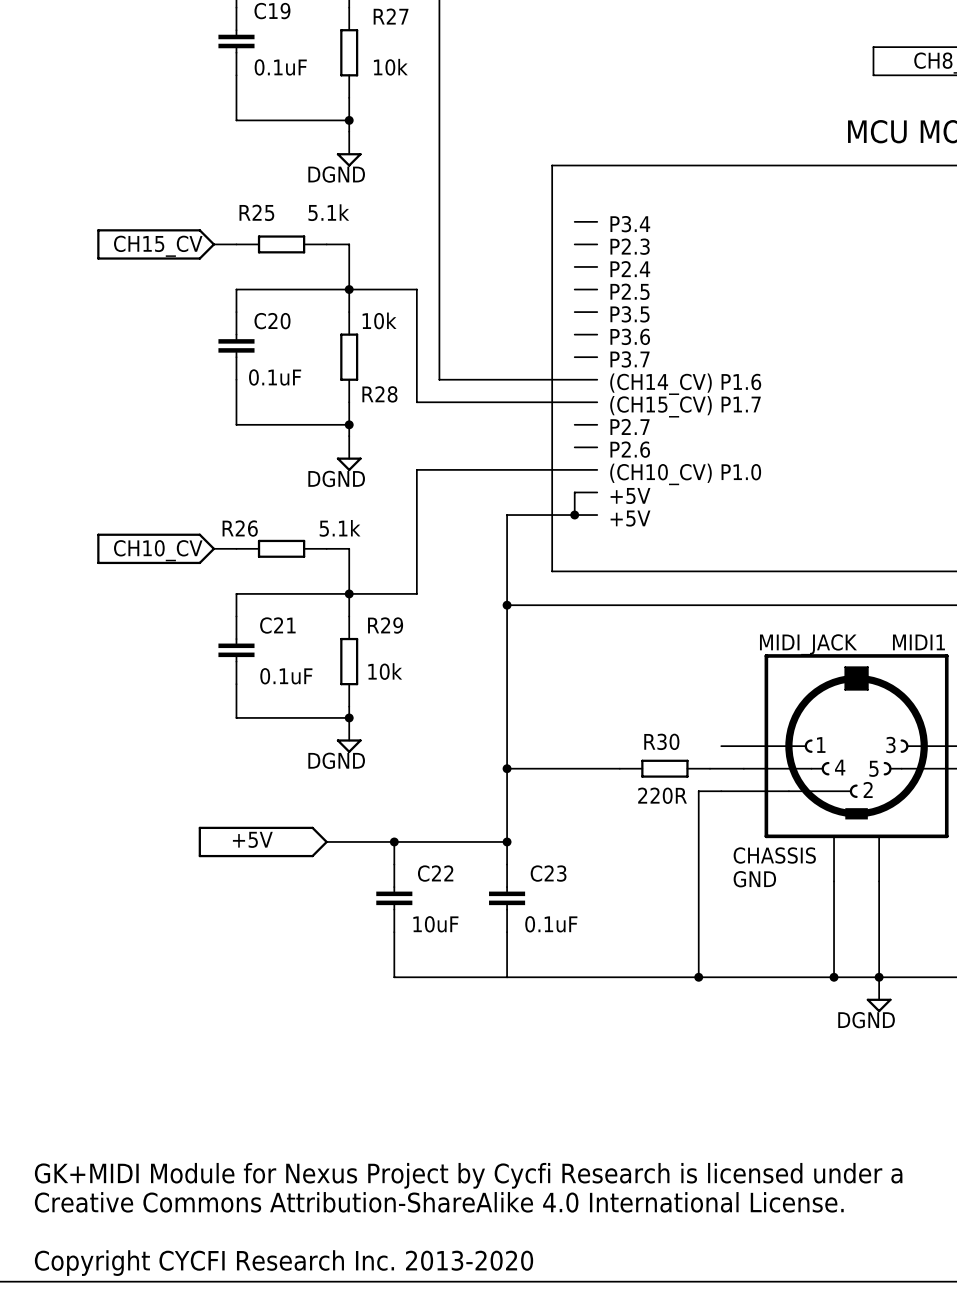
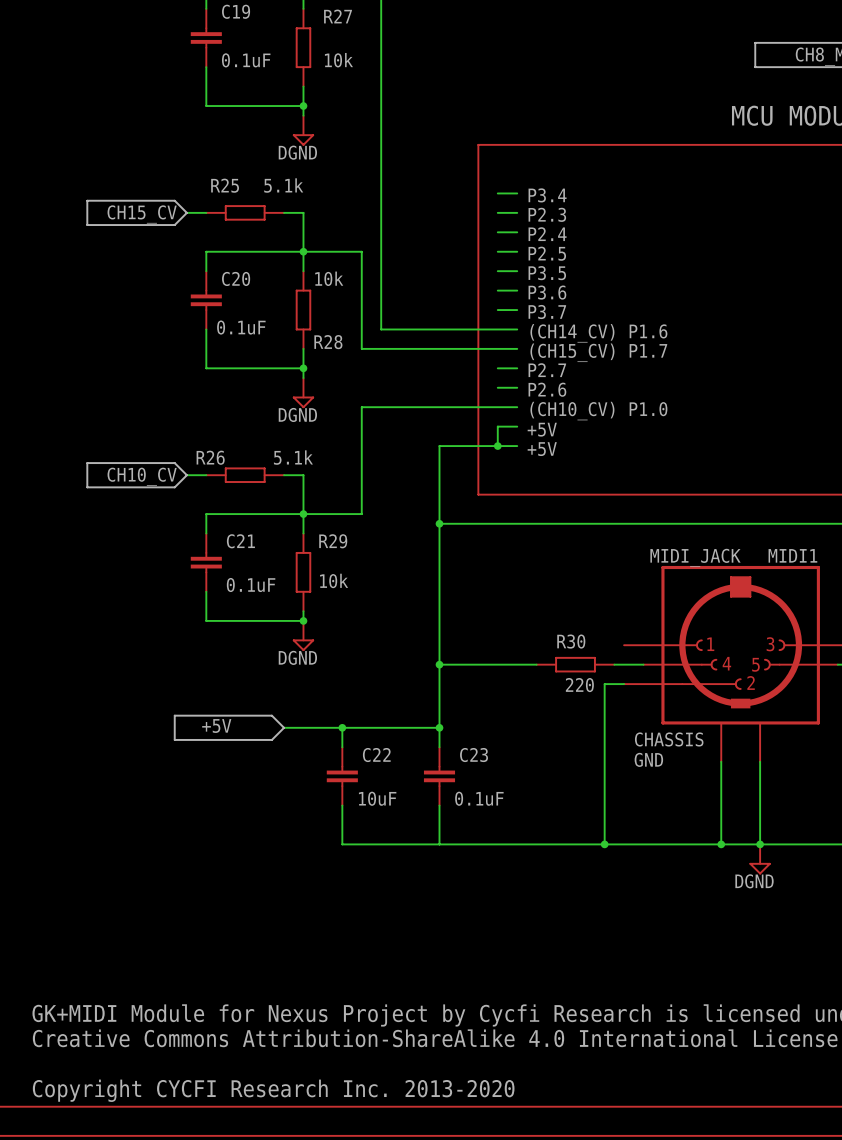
R30 value: 220R (662, 795) -> 220 (579, 685)

